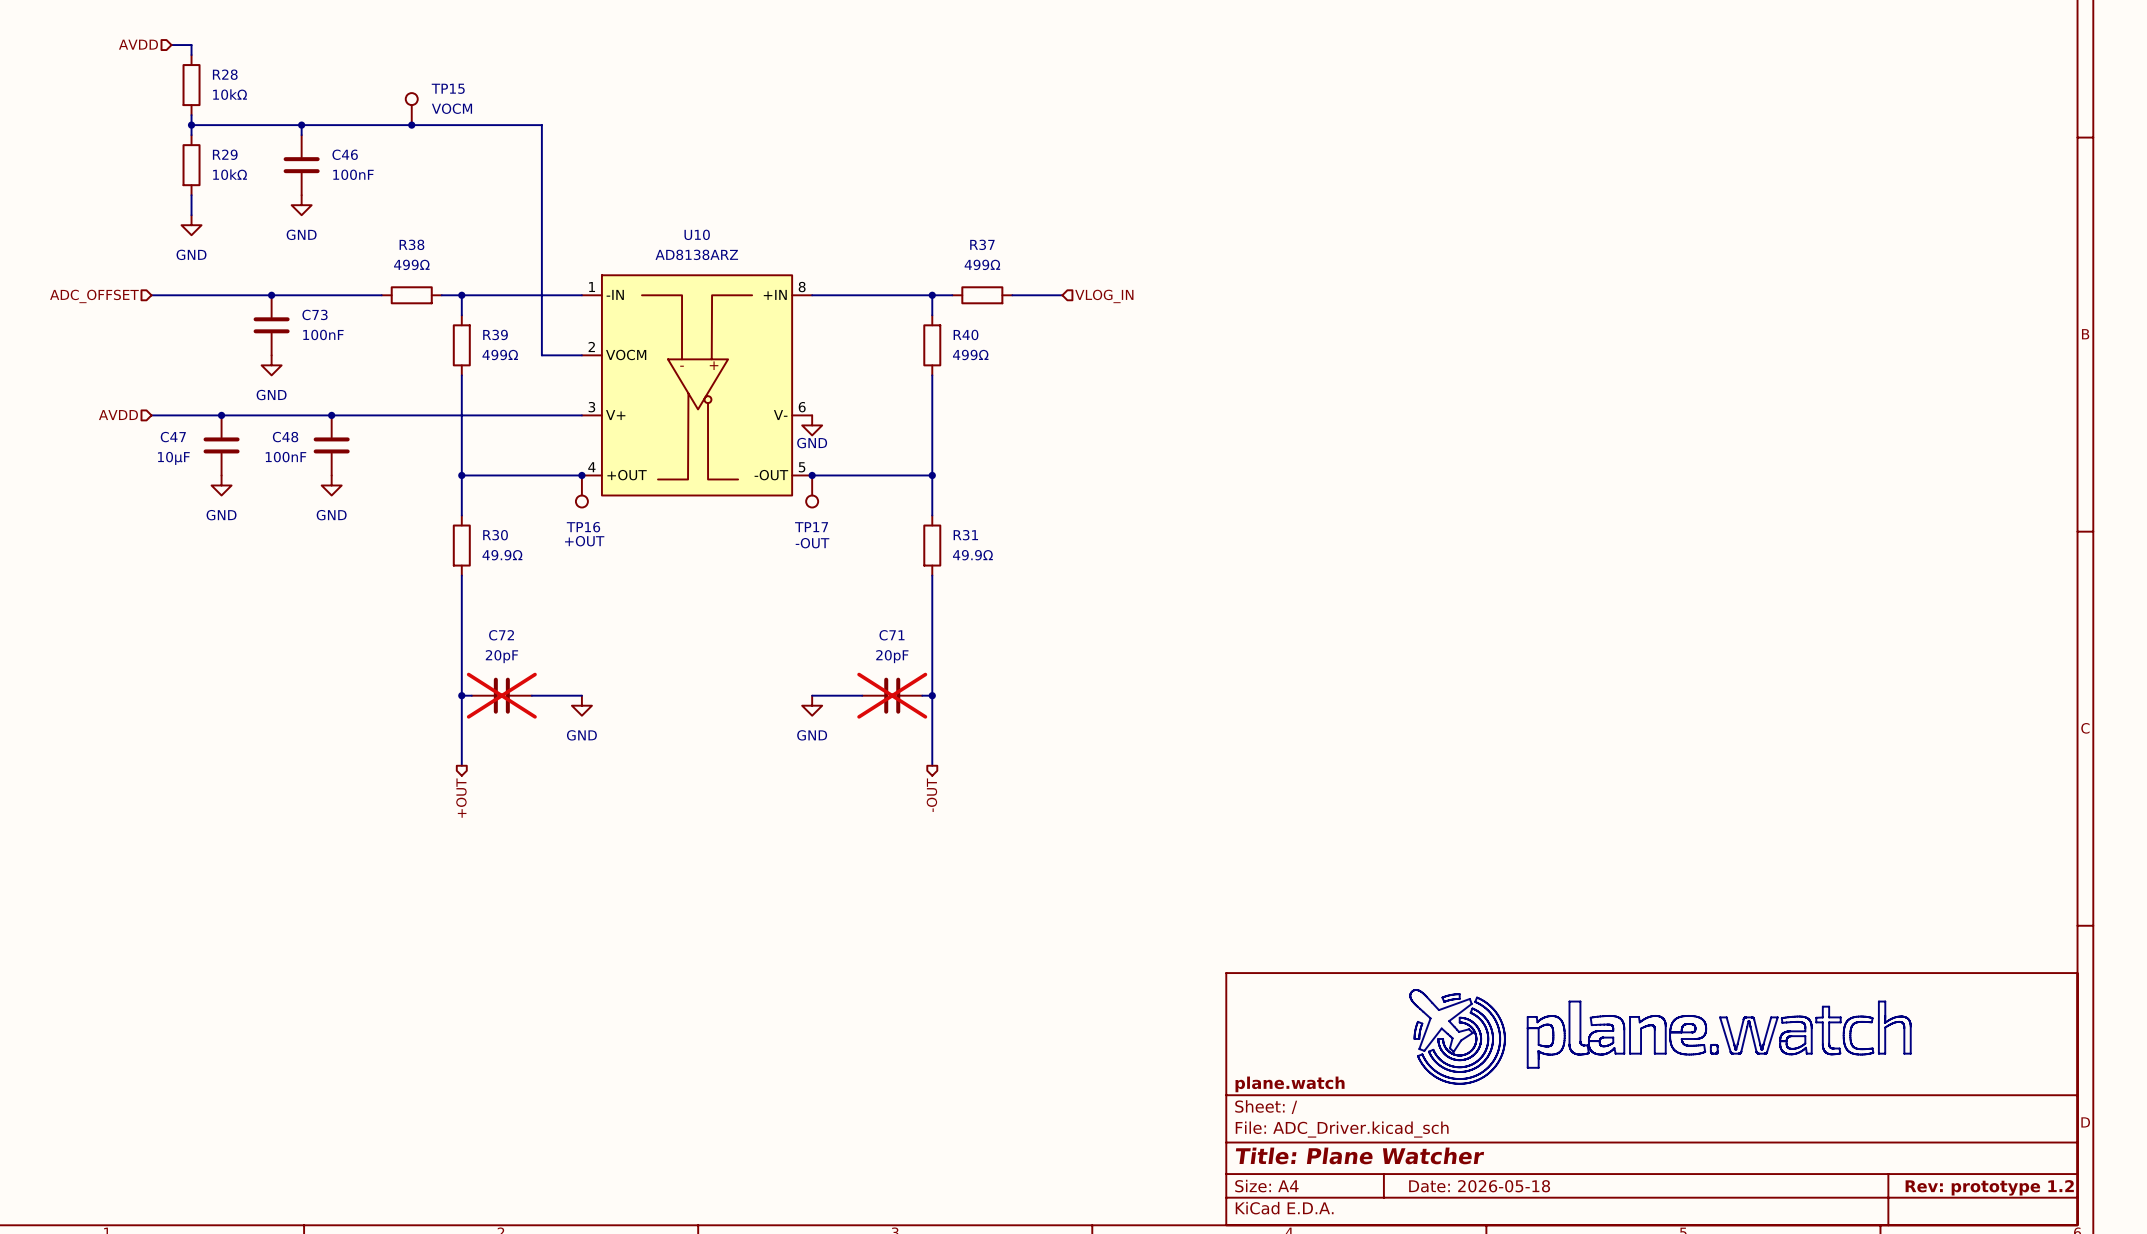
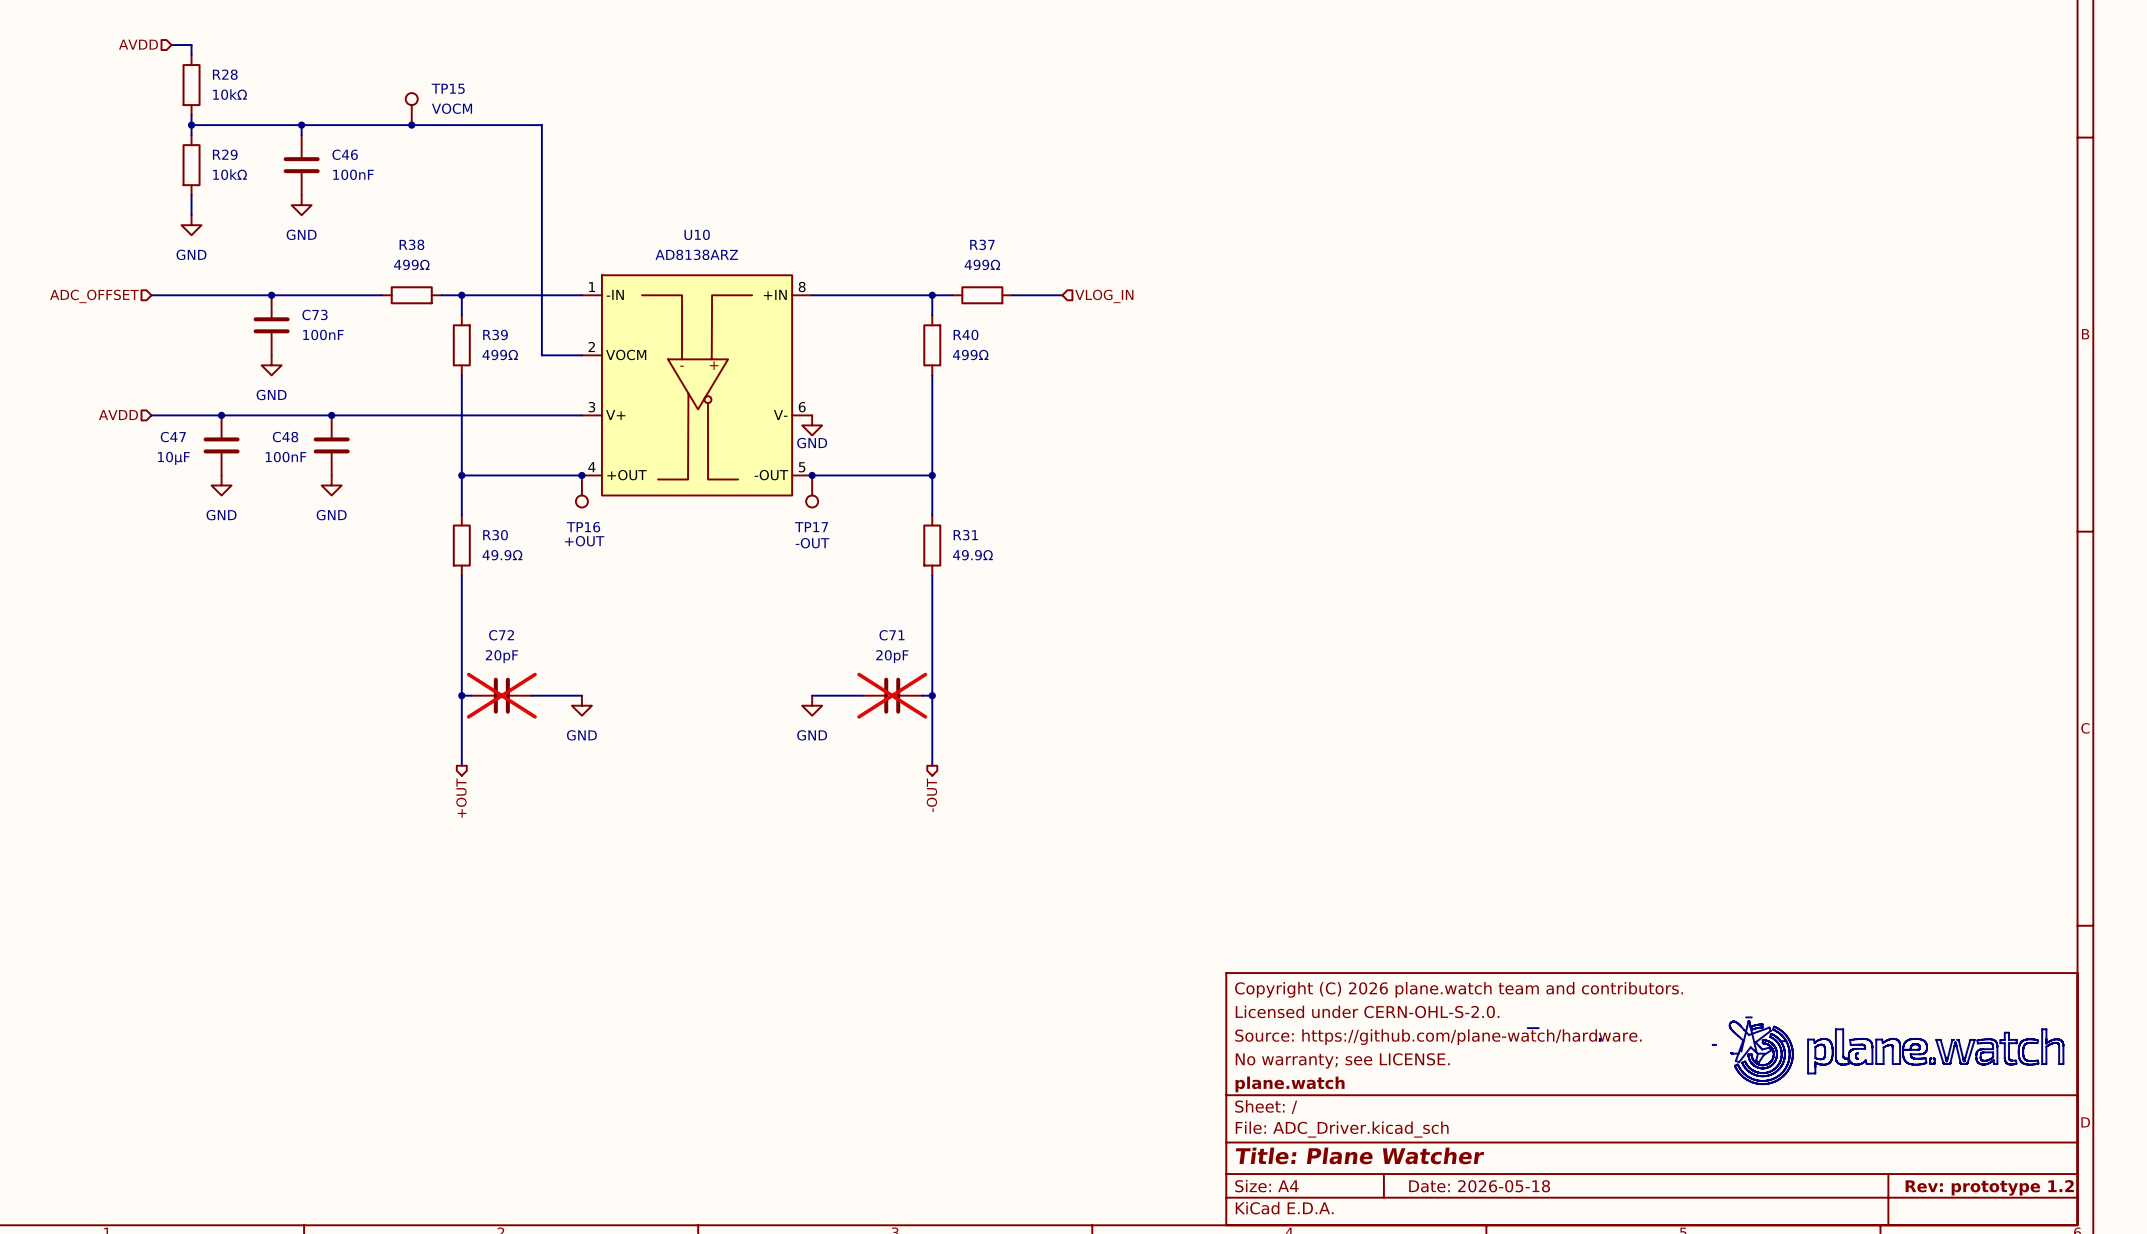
line: (1415, 989) (1410, 993) (1411, 999) (1430, 1018) (1419, 1049) (1424, 1050) (1441, 1028) (1452, 1038) (1449, 1048) (1453, 1051) (1461, 1040) (1472, 1032) (1469, 1029) (1459, 1031) (1449, 1021) (1471, 1003) (1469, 998) (1438, 1010) (1423, 993) (1415, 989) -> none
title block: none -> Copyright (C) 2026 plane.watch team and contributors. (1459, 989)
line: (1458, 994) (1449, 995) (1442, 997) (1444, 1001) (1459, 998) (1458, 994) -> none
line: (1477, 997) (1475, 1001) (1489, 1011) (1498, 1026) (1500, 1040) (1496, 1055) (1490, 1065) (1482, 1072) (1471, 1077) (1459, 1079) (1439, 1073) (1429, 1065) (1422, 1054) (1417, 1056) (1427, 1070) (1441, 1079) (1458, 1083) (1475, 1080) (1490, 1071) (1501, 1057) (1504, 1038) (1501, 1021) (1491, 1007) (1477, 997) -> none
line: (1569, 1001) (1580, 1001) (1580, 1042) (1582, 1045) (1587, 1045) (1588, 1053) (1576, 1054) (1570, 1048) (1569, 1001) -> none
line: (1878, 1001) (1878, 1053) (1885, 1053) (1885, 1027) (1899, 1021) (1904, 1025) (1904, 1053) (1910, 1053) (1909, 1020) (1905, 1017) (1898, 1016) (1884, 1022) (1885, 1001) (1878, 1001) -> none
line: (1822, 1006) (1822, 1017) (1816, 1017) (1816, 1022) (1822, 1022) (1823, 1049) (1829, 1053) (1840, 1053) (1839, 1048) (1832, 1048) (1829, 1046) (1829, 1022) (1840, 1022) (1840, 1017) (1829, 1017) (1829, 1006) (1822, 1006) -> none
line: (1472, 1008) (1470, 1012) (1480, 1019) (1486, 1030) (1488, 1040) (1485, 1050) (1475, 1062) (1460, 1067) (1443, 1062) (1433, 1049) (1428, 1051) (1436, 1062) (1446, 1069) (1458, 1071) (1471, 1069) (1482, 1062) (1490, 1052) (1493, 1039) (1490, 1027) (1483, 1016) (1472, 1008) -> none
title block: none -> Licensed under CERN-OHL-S-2.0. (1367, 1011)
line: (1607, 1015) (1590, 1017) (1591, 1025) (1610, 1024) (1613, 1030) (1592, 1033) (1589, 1038) (1589, 1048) (1598, 1054) (1607, 1053) (1614, 1048) (1615, 1053) (1624, 1053) (1623, 1022) (1617, 1017) (1607, 1015) -> none
line: (1654, 1015) (1639, 1022) (1638, 1016) (1630, 1016) (1630, 1053) (1641, 1053) (1641, 1028) (1651, 1025) (1654, 1027) (1654, 1053) (1665, 1053) (1665, 1022) (1661, 1017) (1654, 1015) -> none
line: (1551, 1016) (1537, 1022) (1536, 1016) (1527, 1016) (1527, 1067) (1538, 1067) (1538, 1051) (1553, 1054) (1559, 1052) (1562, 1048) (1564, 1035) (1563, 1023) (1558, 1017) (1551, 1016) -> none
line: (1799, 1016) (1781, 1018) (1782, 1022) (1800, 1022) (1805, 1026) (1805, 1031) (1787, 1031) (1781, 1034) (1780, 1047) (1786, 1053) (1796, 1053) (1806, 1047) (1806, 1053) (1811, 1053) (1810, 1022) (1806, 1017) (1799, 1016) -> none
line: (1860, 1016) (1851, 1018) (1845, 1023) (1843, 1032) (1845, 1046) (1848, 1051) (1854, 1054) (1873, 1052) (1872, 1048) (1857, 1048) (1851, 1043) (1850, 1031) (1853, 1024) (1859, 1022) (1871, 1022) (1872, 1018) (1860, 1016) -> none
line: (1459, 1017) (1459, 1022) (1469, 1025) (1475, 1033) (1475, 1042) (1471, 1050) (1463, 1055) (1454, 1054) (1446, 1048) (1443, 1038) (1438, 1038) (1439, 1047) (1444, 1053) (1451, 1058) (1459, 1060) (1467, 1058) (1474, 1053) (1479, 1047) (1481, 1038) (1479, 1030) (1474, 1023) (1467, 1019) (1459, 1017) -> none
line: (1753, 1018) (1762, 1049) (1771, 1017) (1777, 1017) (1767, 1051) -> none
line: (1743, 1019) (1735, 1049) (1726, 1017) (1720, 1017) (1730, 1051) -> none
line: (1417, 1021) (1415, 1030) (1414, 1038) (1419, 1038) (1422, 1023) (1417, 1021) -> none
line: none -> (1733, 1021) (1730, 1023) (1730, 1027) (1743, 1040) (1735, 1060) (1739, 1062) (1750, 1047) (1757, 1053) (1756, 1060) (1758, 1062) (1763, 1055) (1771, 1050) (1768, 1047) (1762, 1049) (1755, 1042) (1770, 1030) (1769, 1027) (1748, 1035) (1738, 1024) (1733, 1021)
line: (1547, 1024) (1552, 1028) (1552, 1043) (1548, 1046) (1538, 1044) (1538, 1028) (1547, 1024) -> none
line: none -> (1761, 1024) (1756, 1025) (1751, 1026) (1752, 1029) (1762, 1027) (1761, 1024)
line: none -> (1774, 1026) (1773, 1029) (1782, 1035) (1788, 1045) (1789, 1055) (1787, 1065) (1777, 1076) (1762, 1080) (1749, 1077) (1737, 1064) (1734, 1065) (1741, 1075) (1750, 1081) (1761, 1084) (1774, 1081) (1784, 1075) (1790, 1065) (1792, 1054) (1790, 1042) (1784, 1033) (1774, 1026)
line: none -> (2042, 1029) (2042, 1064) (2046, 1064) (2046, 1046) (2055, 1042) (2059, 1045) (2059, 1064) (2063, 1064) (2062, 1041) (2055, 1039) (2046, 1043) (2046, 1029) (2042, 1029)
line: (1670, 1032) (1671, 1044) (1677, 1052) (1689, 1054) (1705, 1051) (1704, 1044) (1686, 1045) (1681, 1039) (1698, 1038) (1703, 1036) (1705, 1025) (1700, 1018) (1688, 1015) (1677, 1017) (1672, 1022) (1670, 1032) -> none
line: (1670, 1032) (1691, 1032) (1693, 1032) (1694, 1026) (1691, 1024) (1684, 1024) (1682, 1027) (1681, 1029) (1681, 1030) (1681, 1031) (1681, 1032) -> none
line: none -> (1771, 1033) (1770, 1036) (1776, 1041) (1780, 1048) (1780, 1061) (1773, 1069) (1763, 1073) (1752, 1069) (1745, 1061) (1742, 1062) (1746, 1069) (1753, 1074) (1762, 1076) (1770, 1074) (1778, 1070) (1783, 1063) (1784, 1054) (1783, 1045) (1778, 1038) (1771, 1033)
line: (1790, 1036) (1805, 1036) (1805, 1043) (1796, 1048) (1789, 1048) (1786, 1040) (1790, 1036) -> none
title block: none -> Source: https://github.com/plane-watch/hardware. (1438, 1037)
line: (1600, 1038) (1613, 1037) (1613, 1042) (1603, 1046) (1600, 1044) (1599, 1041) (1588, 1041) -> none
line: none -> (1823, 1038) (1814, 1043) (1814, 1039) (1808, 1039) (1808, 1073) (1815, 1073) (1815, 1062) (1825, 1064) (1831, 1060) (1831, 1044) (1828, 1040) (1823, 1038)
line: none -> (1987, 1039) (1977, 1040) (1977, 1043) (1991, 1043) (1993, 1049) (1978, 1050) (1976, 1053) (1976, 1060) (1984, 1064) (1993, 1060) (1994, 1064) (1997, 1064) (1996, 1042) (1993, 1040) (1987, 1039)
line: none -> (2030, 1039) (2023, 1040) (2020, 1043) (2019, 1059) (2026, 1064) (2038, 1063) (2038, 1060) (2027, 1060) (2023, 1057) (2025, 1044) (2037, 1043) (2038, 1040) (2030, 1039)
line: none -> (1762, 1040) (1762, 1043) (1769, 1045) (1773, 1050) (1773, 1056) (1770, 1062) (1765, 1064) (1758, 1064) (1753, 1060) (1751, 1054) (1748, 1054) (1752, 1064) (1762, 1068) (1772, 1064) (1776, 1054) (1772, 1044) (1762, 1040)
line: none -> (1952, 1041) (1946, 1061) (1940, 1039) (1936, 1039) (1943, 1062)
line: none -> (1958, 1041) (1964, 1061) (1970, 1039) (1974, 1039) (1967, 1062)
line: none -> (1820, 1044) (1823, 1045) (1825, 1049) (1824, 1056) (1821, 1059) (1815, 1058) (1815, 1047) (1820, 1044)
line: none -> (1918, 1044) (1912, 1044) (1910, 1049)
line: none -> (1863, 1045) (1850, 1045) (1850, 1040) (1863, 1038) (1870, 1041) (1872, 1064) (1866, 1064) (1865, 1060) (1858, 1064) (1851, 1062) (1848, 1058) (1850, 1051) (1865, 1048) (1864, 1046)
line: none -> (1891, 1045) (1883, 1047) (1883, 1064) (1876, 1064) (1876, 1039) (1882, 1039) (1882, 1043) (1893, 1038) (1899, 1043) (1900, 1064) (1892, 1064) (1892, 1046)
line: none -> (1919, 1045) (1919, 1048)
line: (1710, 1046) (1710, 1051) -> none
line: (1717, 1046) (1717, 1051) -> none
line: none -> (1903, 1049) (1903, 1058) (1907, 1062) (1915, 1064) (1926, 1062) (1925, 1058) (1913, 1058) (1910, 1054) (1925, 1052) (1926, 1045) (1923, 1040) (1908, 1040) (1904, 1043) (1903, 1049)
line: none -> (1903, 1049) (1918, 1049)
line: none -> (1982, 1052) (1993, 1052) (1993, 1057) (1983, 1060) (1980, 1055)
line: (1712, 1053) (1715, 1053) -> none
line: none -> (1843, 1056) (1843, 1029) (1835, 1029) (1836, 1060) (1840, 1064) (1848, 1063) (1847, 1058) (1845, 1058)
line: none -> (1930, 1059) (1930, 1062)
line: none -> (1934, 1059) (1934, 1062)
line: none -> (2009, 1059) (2009, 1043) (2016, 1043) (2016, 1039) (2009, 1039) (2009, 1032) (2004, 1032) (2004, 1039) (2000, 1040) (2000, 1043) (2004, 1043) (2005, 1061) (2008, 1064) (2016, 1063) (2015, 1060) (2010, 1060)
title block: none -> No warranty; see LICENSE. (1342, 1060)
line: none -> (1950, 1062) (1955, 1042) (1960, 1062)
line: none -> (1931, 1064) (1933, 1064)
line: none -> (1944, 1064) (1948, 1064)
line: none -> (1962, 1064) (1966, 1064)

